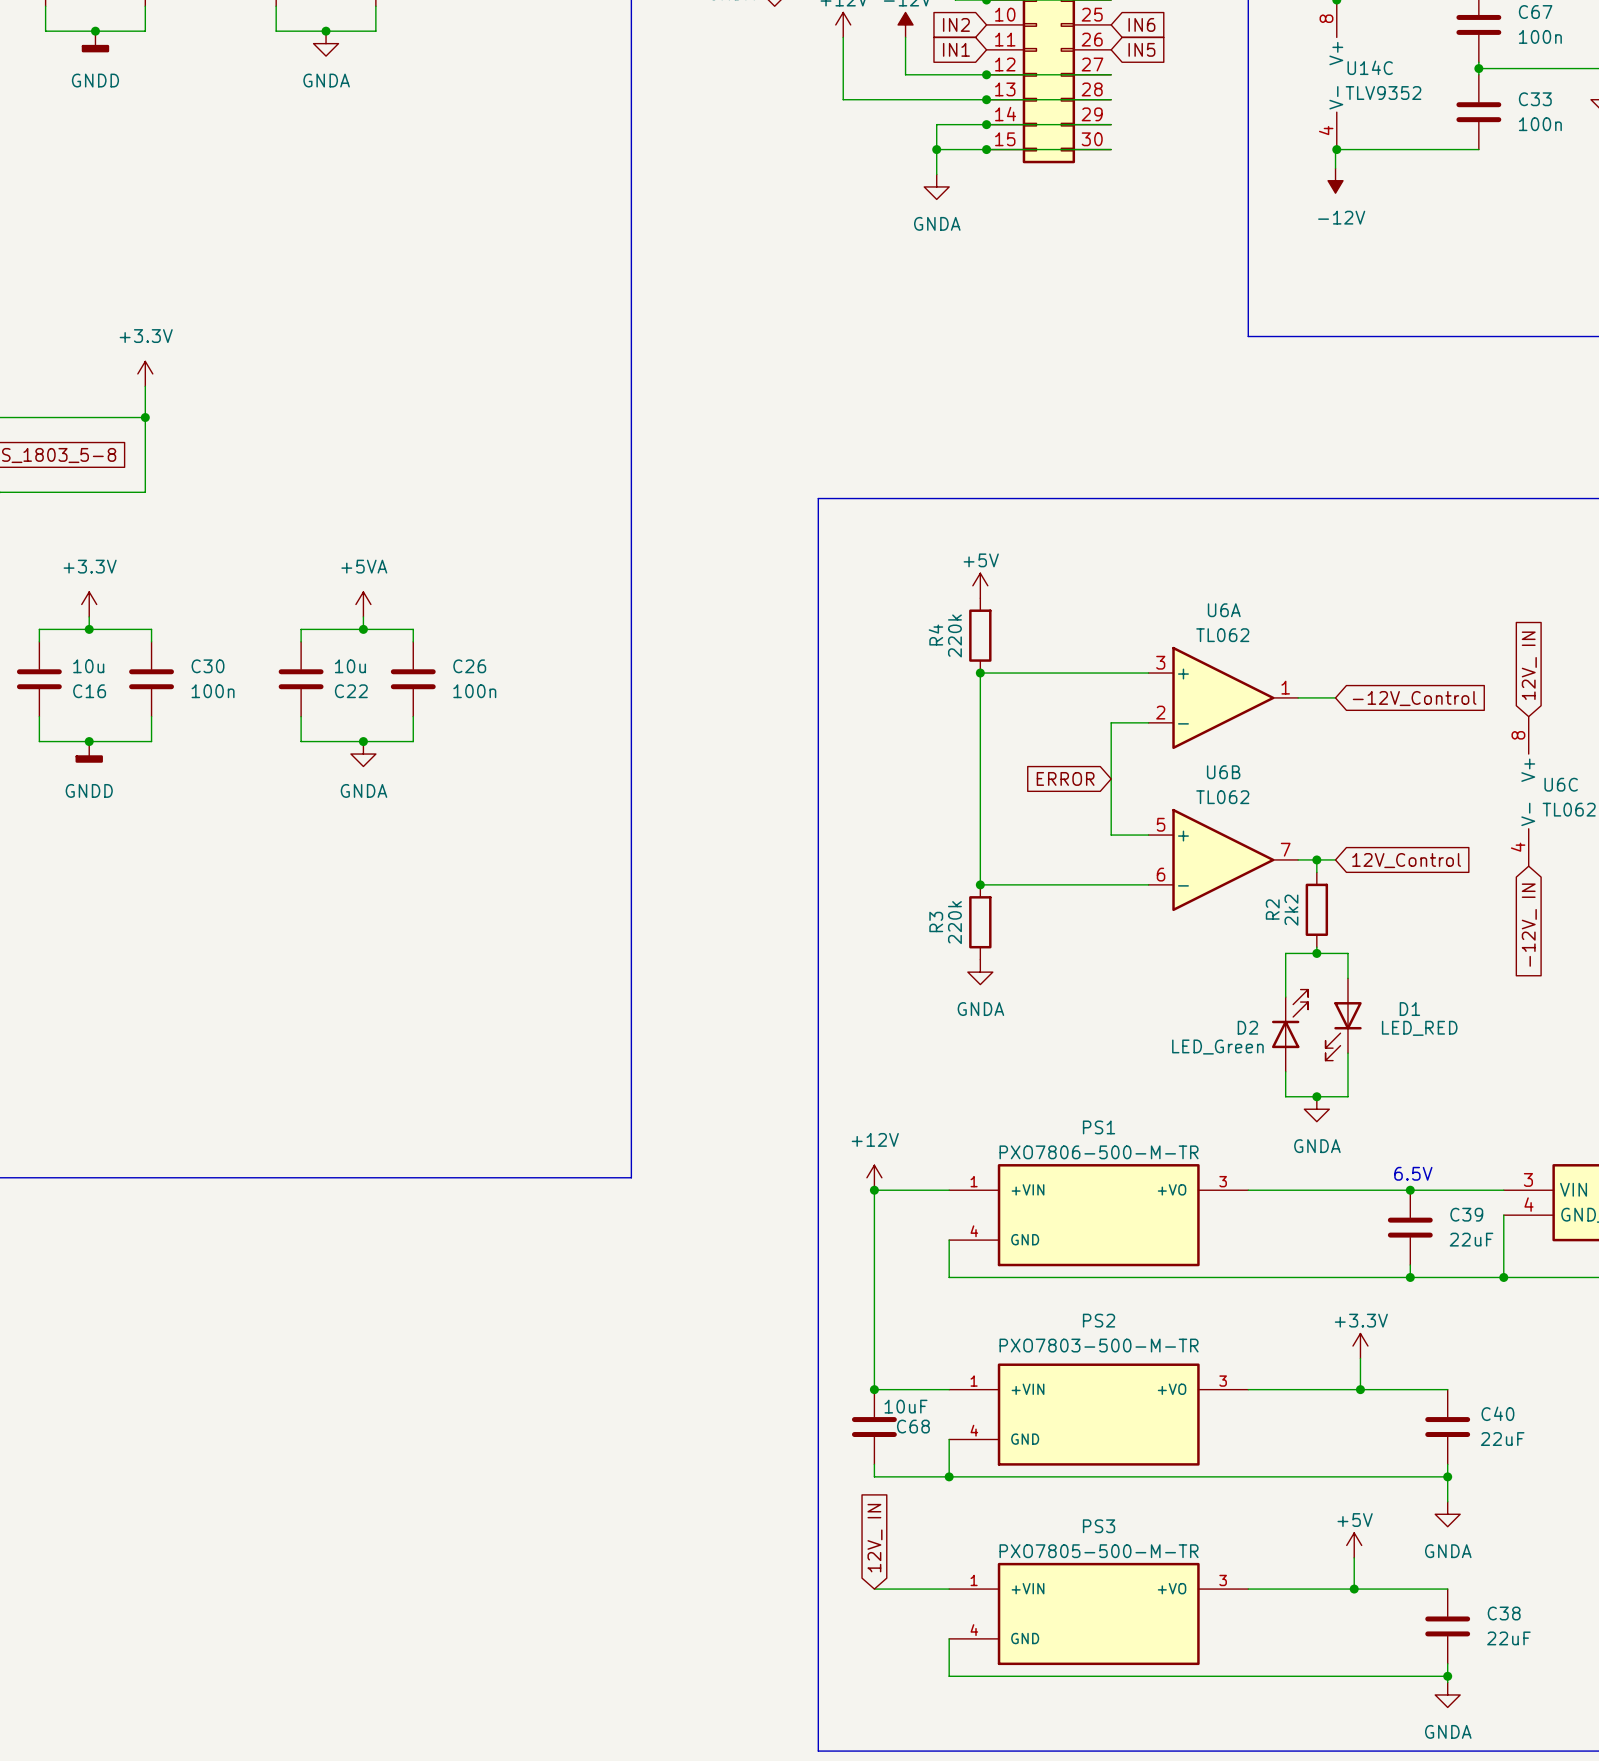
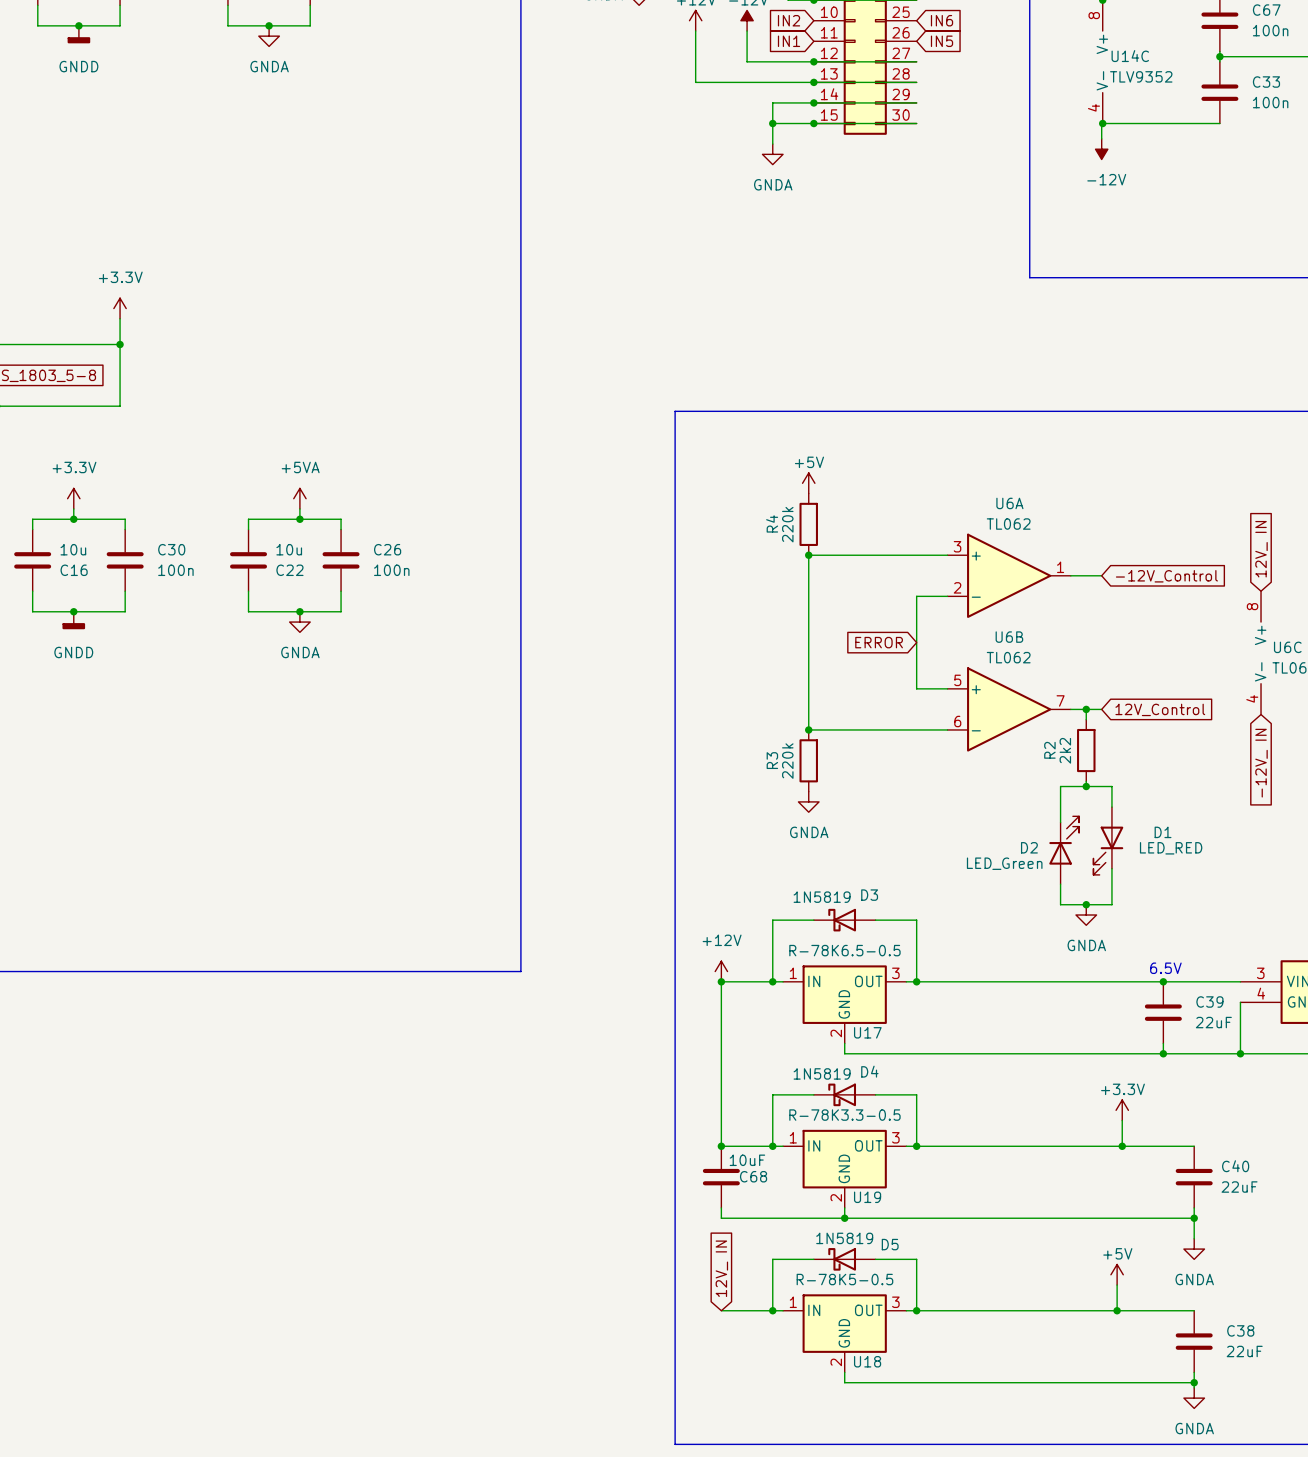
wire: none -> (813, 920) (772, 920) (772, 981)
D3: none -> 1N5819 (844, 920)
wire: none -> (875, 920) (916, 920) (916, 981)
junction: none -> (772, 981)
junction: none -> (916, 981)
PS1: PXO7806-500-M-TR (1098, 1215) -> none
U17: none -> R-78K6.5-0.5 (844, 1004)
wire: (949, 1240) (949, 1277) (1023, 1277) -> (844, 1043) (844, 1053)
wire: none -> (813, 1094) (772, 1094) (772, 1146)
D4: none -> 1N5819 (844, 1094)
wire: none -> (875, 1094) (916, 1094) (916, 1146)
junction: none -> (772, 1146)
junction: none -> (916, 1146)
PS2: PXO7803-500-M-TR (1098, 1414) -> none
U19: none -> R-78K3.3-0.5 (844, 1168)
wire: (949, 1439) (949, 1476) -> none
wire: none -> (844, 1207) (844, 1218)
junction: (949, 1476) -> none
junction: none -> (844, 1218)
wire: none -> (813, 1259) (772, 1259) (772, 1310)
D5: none -> 1N5819 (844, 1259)
wire: none -> (875, 1259) (916, 1259) (916, 1310)
junction: none -> (772, 1310)
junction: none -> (916, 1310)
PS3: PXO7805-500-M-TR (1098, 1613) -> none
U18: none -> R-78K5-0.5 (844, 1333)
wire: (949, 1638) (949, 1676) (1023, 1676) -> (844, 1372) (844, 1382)

